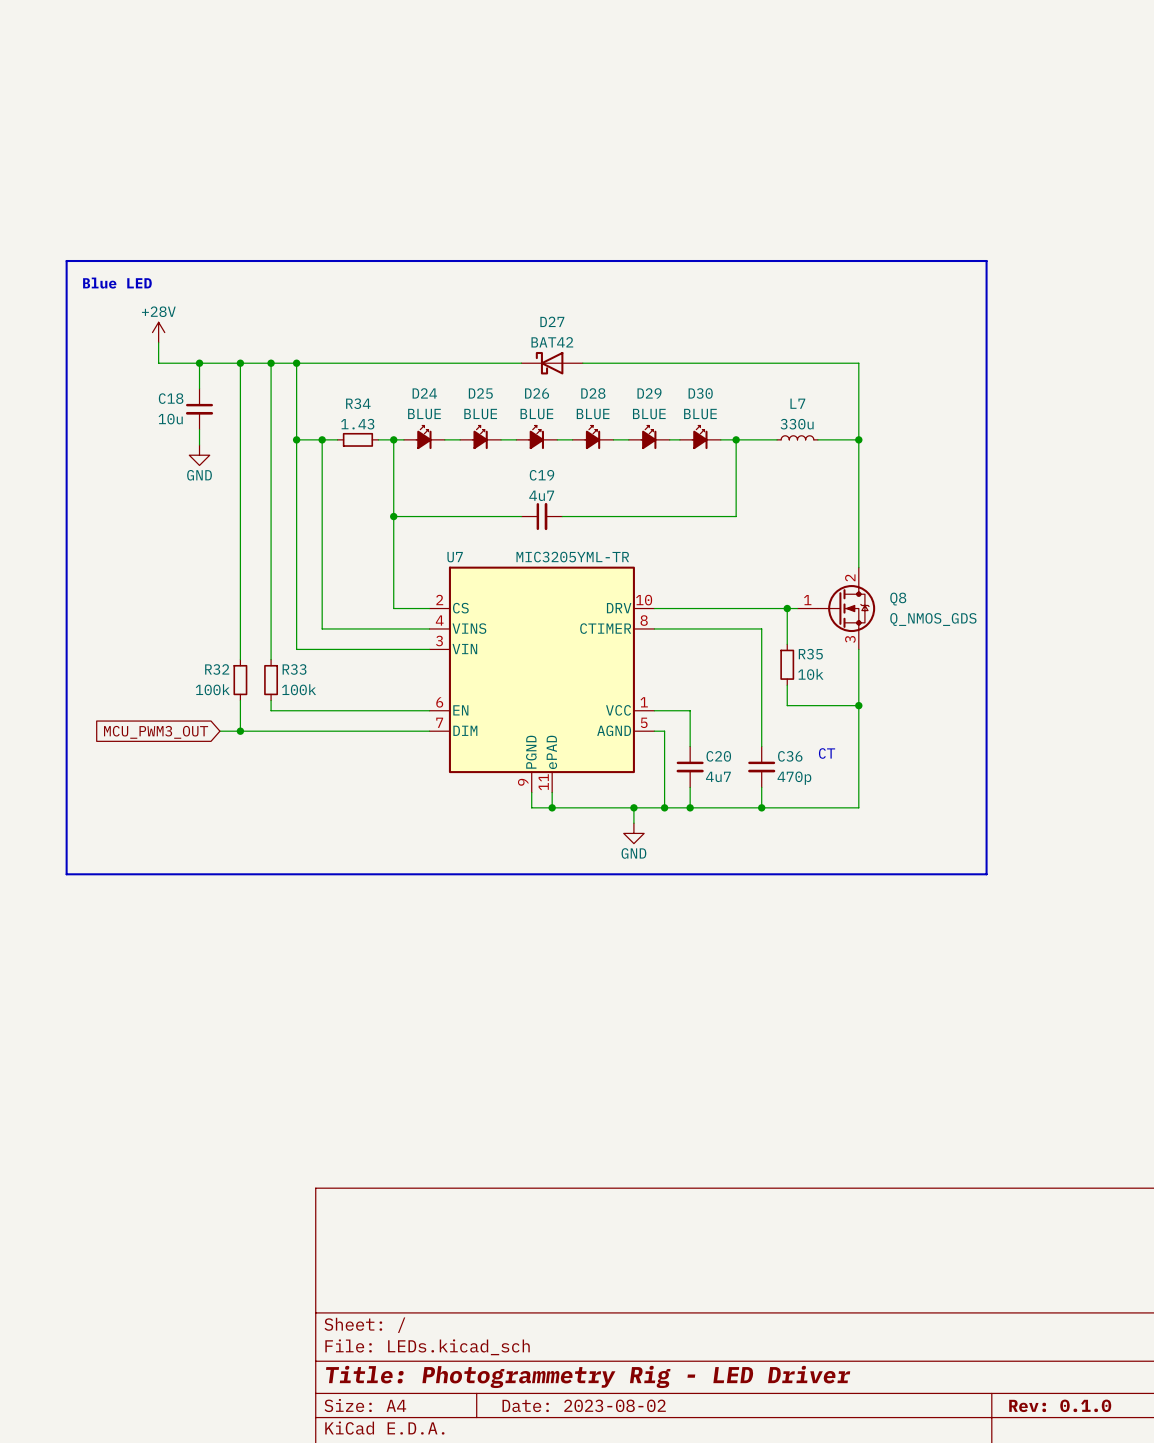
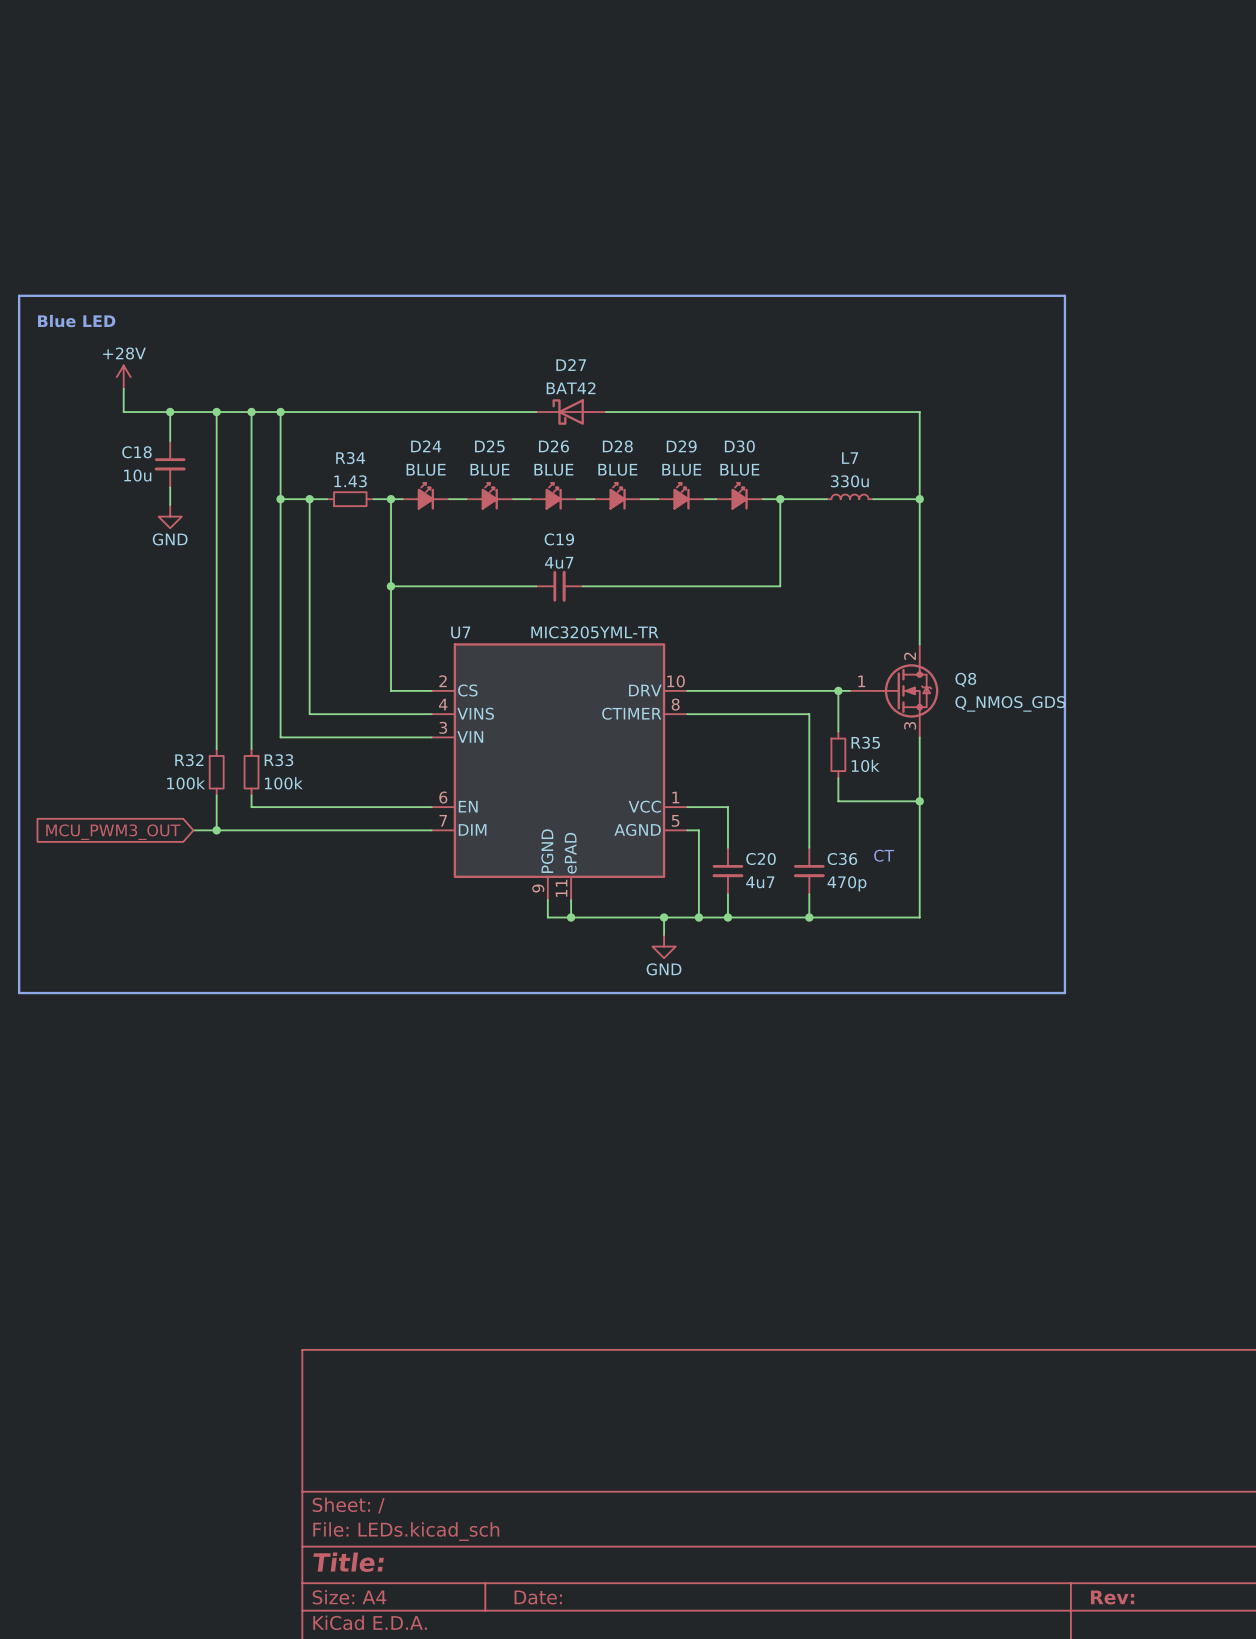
title block: Title: Photogrammetry Rig - LED Driver (588, 1376) -> Title: (348, 1562)
title block: Date: 2023-08-02 (584, 1405) -> Date: (538, 1597)
title block: Rev: 0.1.0 (1060, 1405) -> Rev: (1112, 1597)

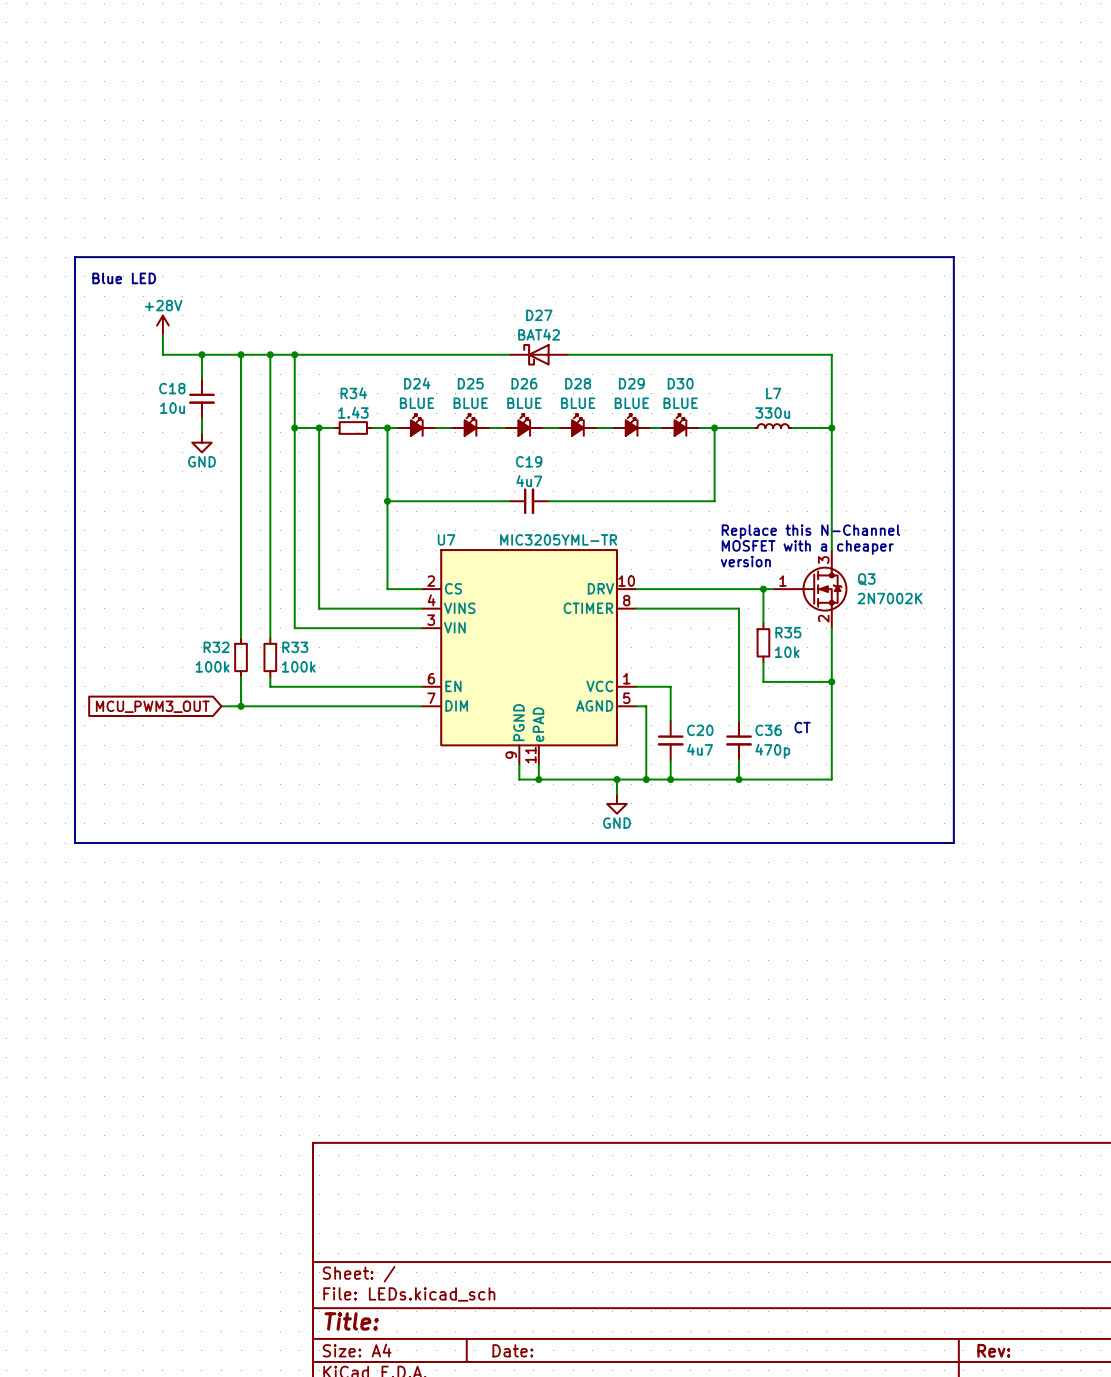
text: none -> Replace this N-Channel (810, 531)
text: none -> MOSFET with a cheaper (807, 547)
Q8 pin number: 2 (910, 656) -> 3 (823, 560)
text: none -> version (745, 561)
Q8 name: Q8 (965, 679) -> Q3 (866, 579)
Q8 value: Q_NMOS_GDS (1010, 703) -> 2N7002K (889, 598)
Q8 pin number: 3 (910, 725) -> 2 (823, 618)

